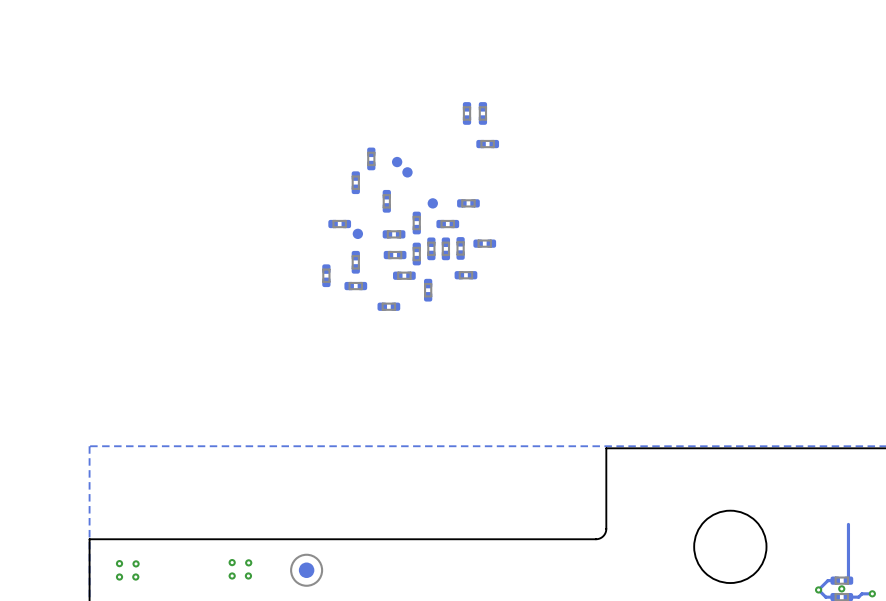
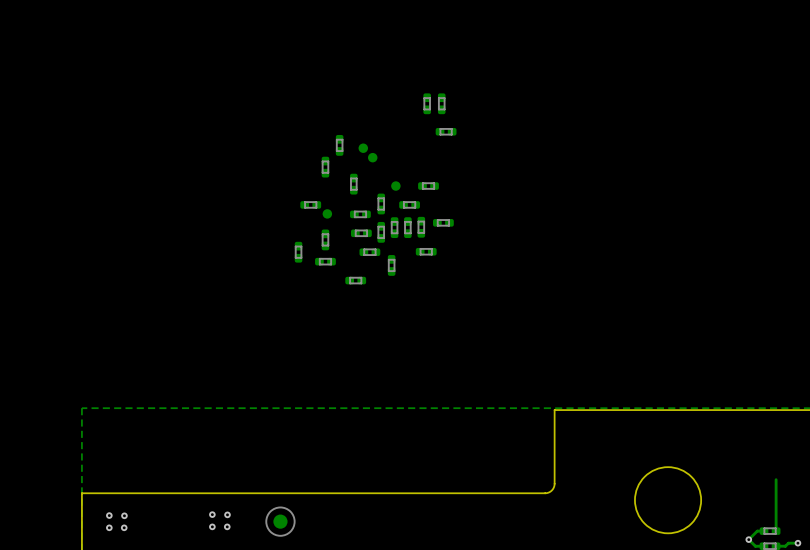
via: (841, 588) -> none

